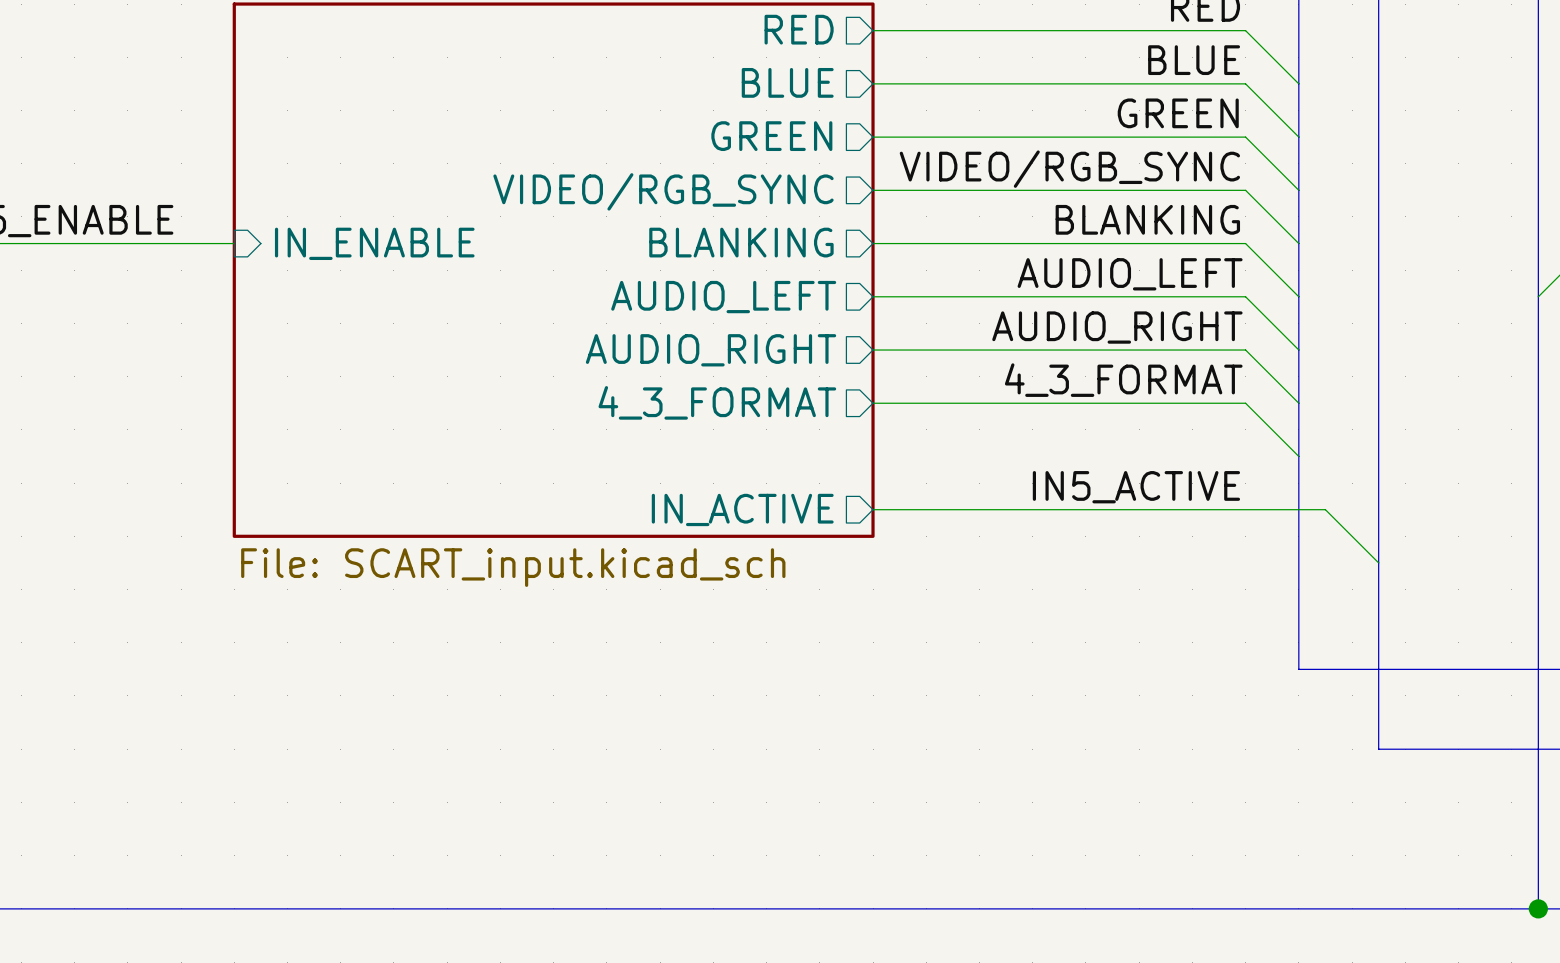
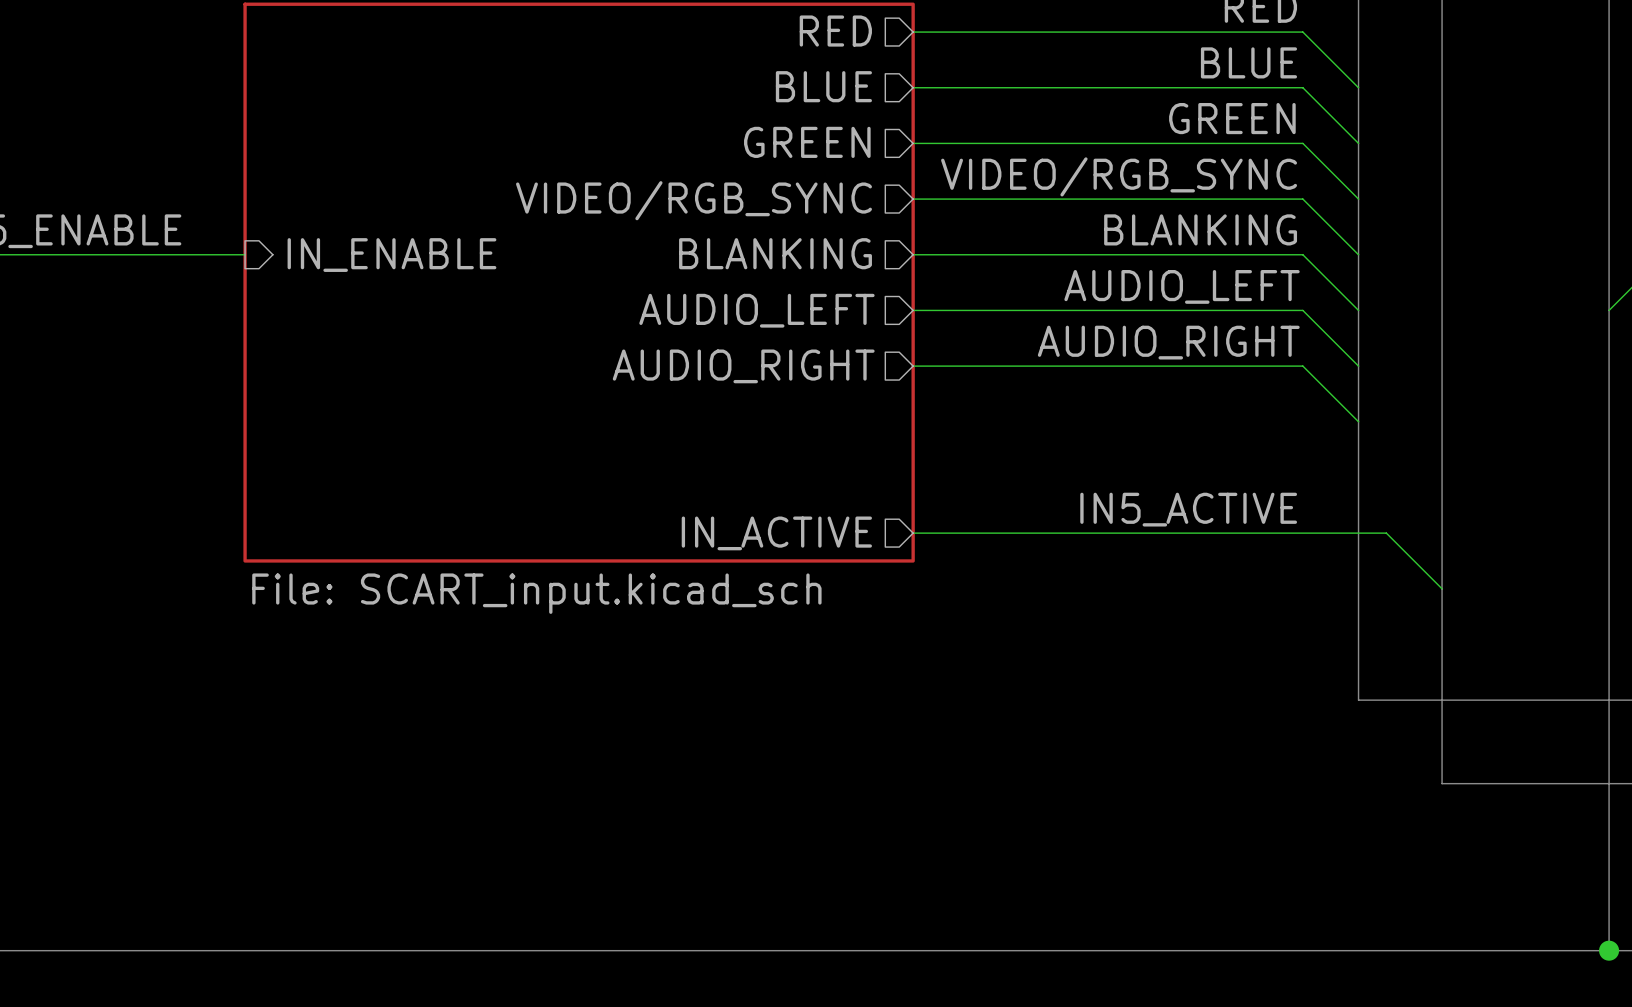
label: 4_3_FORMAT (1123, 380) -> none
sheet pin: 4_3_FORMAT (717, 402) -> none
wire: (873, 403) (1245, 403) (1298, 456) -> none

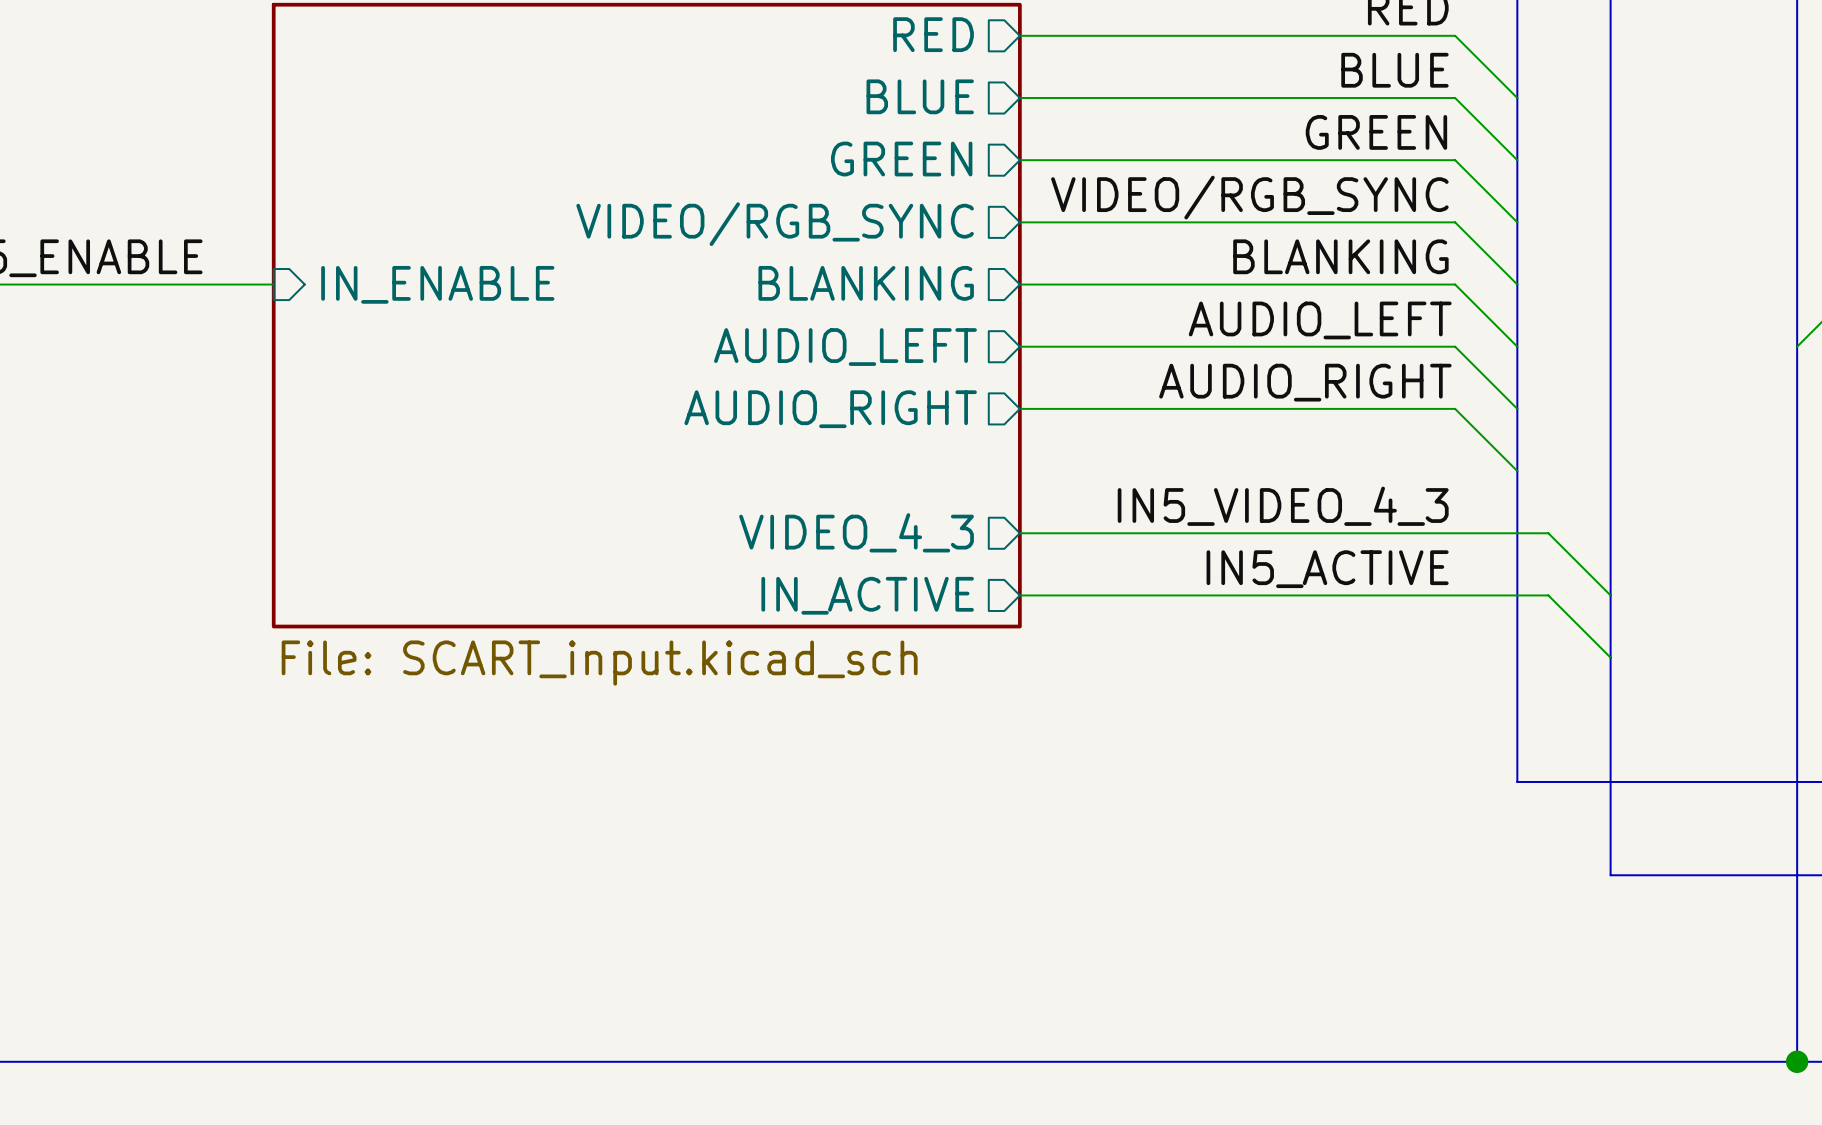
label: none -> IN5_VIDEO_4_3 (1283, 506)
sheet pin: none -> VIDEO_4_3 (856, 532)
wire: none -> (1019, 533) (1548, 533) (1610, 595)

